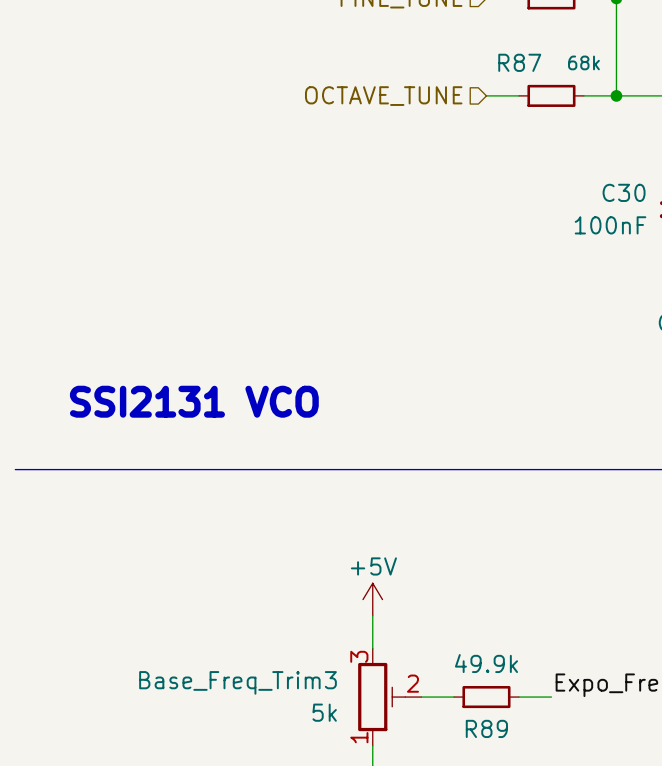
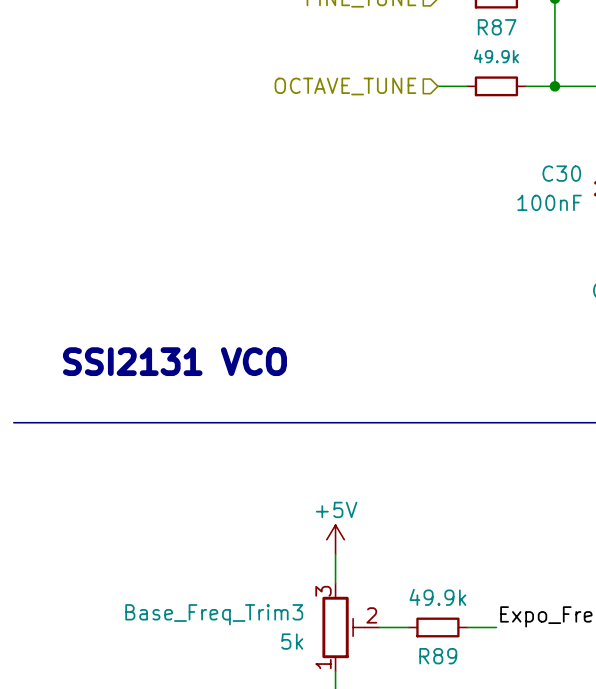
R87 name position: R87 (519, 62) -> R87 (497, 27)
R87 value: 68k (583, 62) -> 49.9k (496, 56)

